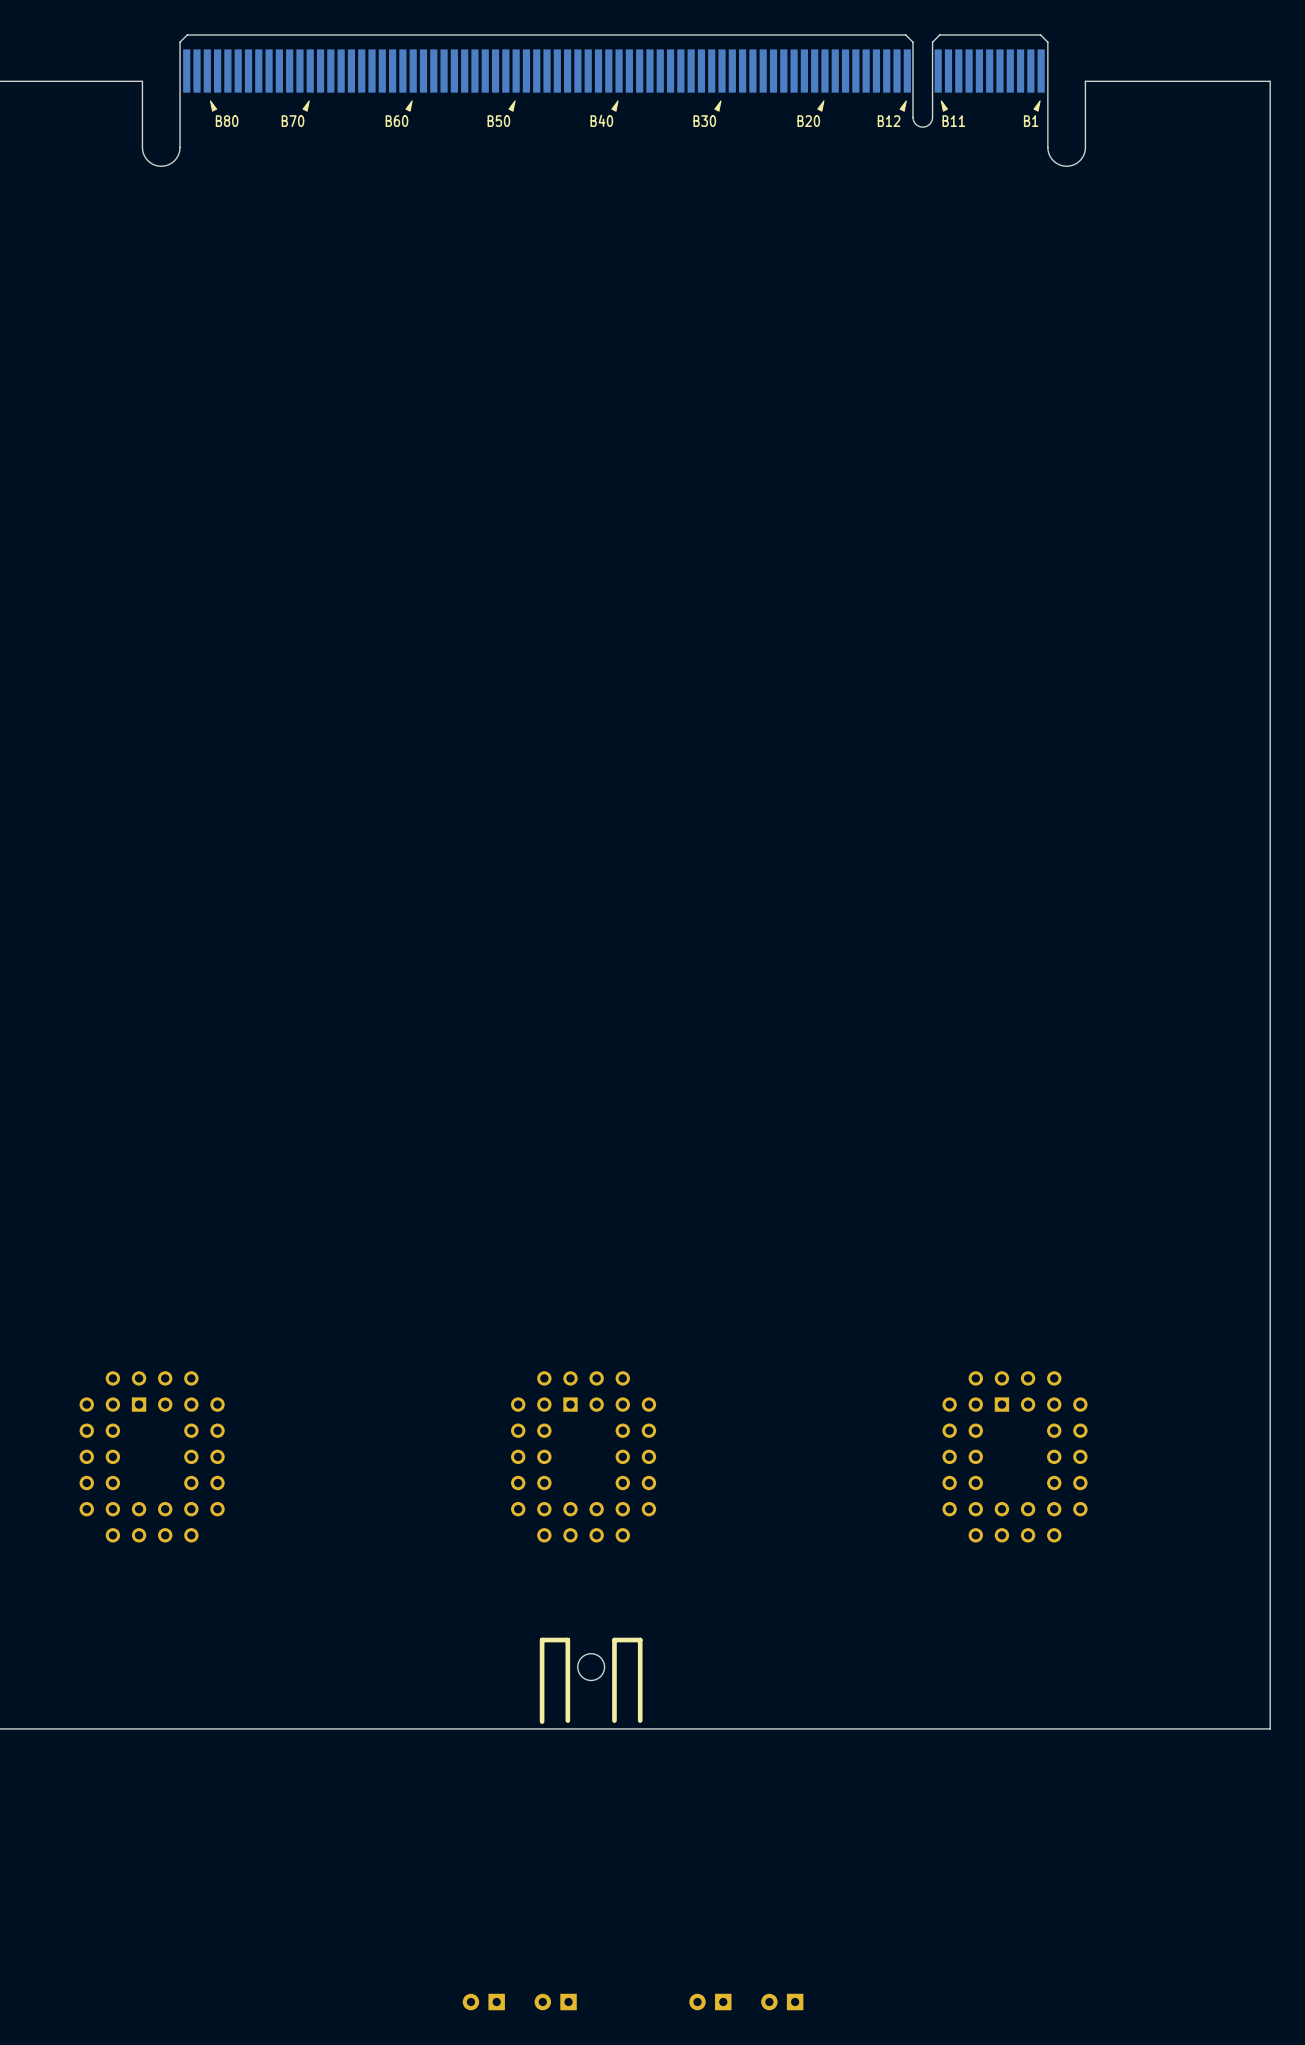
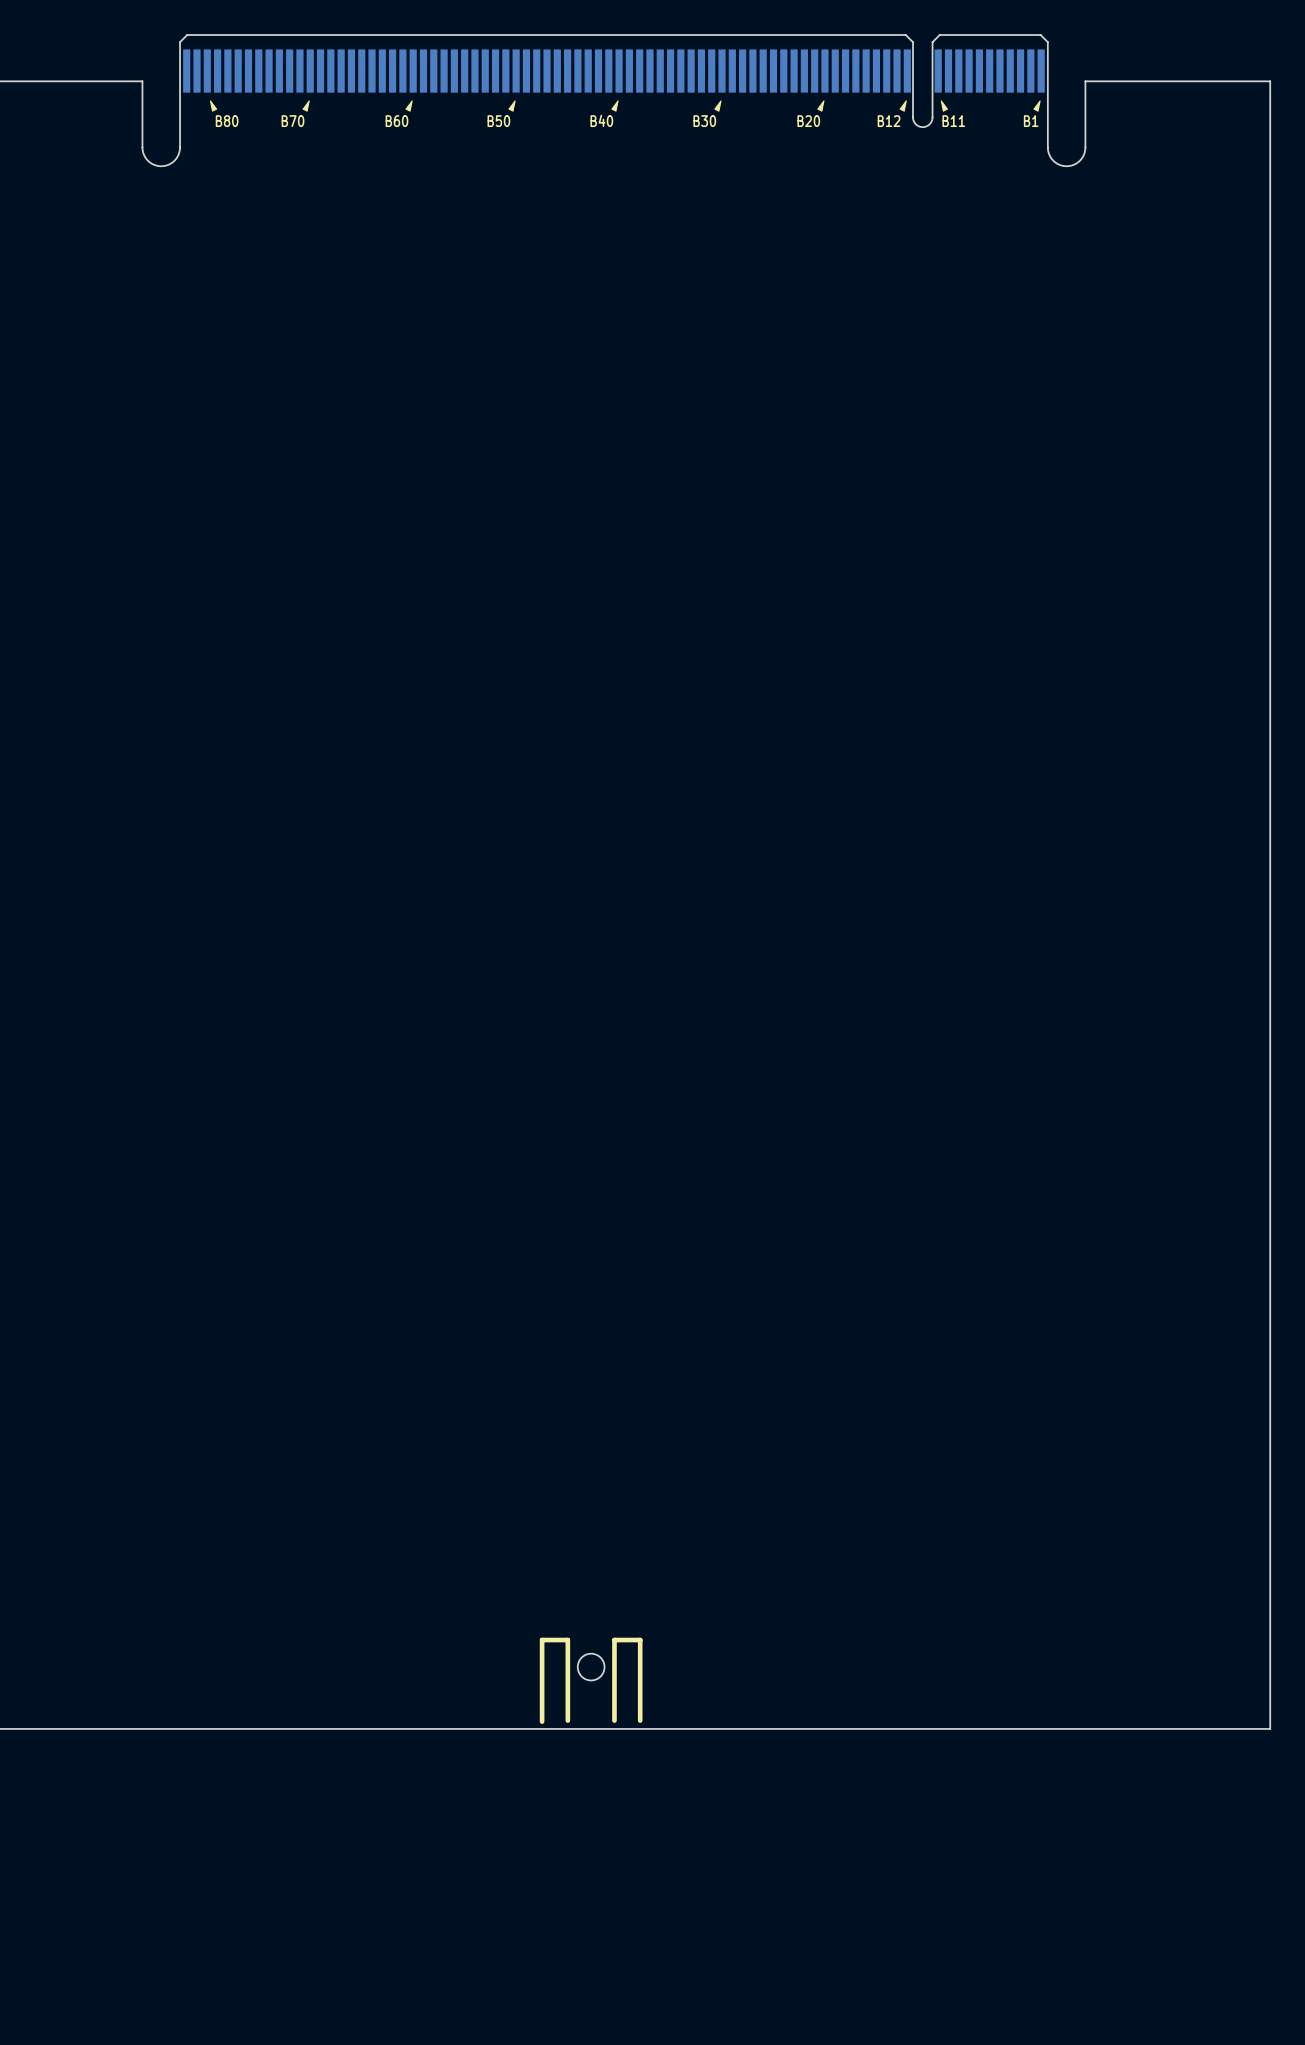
part: (152, 1456) -> none
part: (583, 1456) -> none
part: (1015, 1456) -> none
part: (483, 2002) -> none
part: (555, 2002) -> none
part: (710, 2002) -> none
part: (782, 2002) -> none

